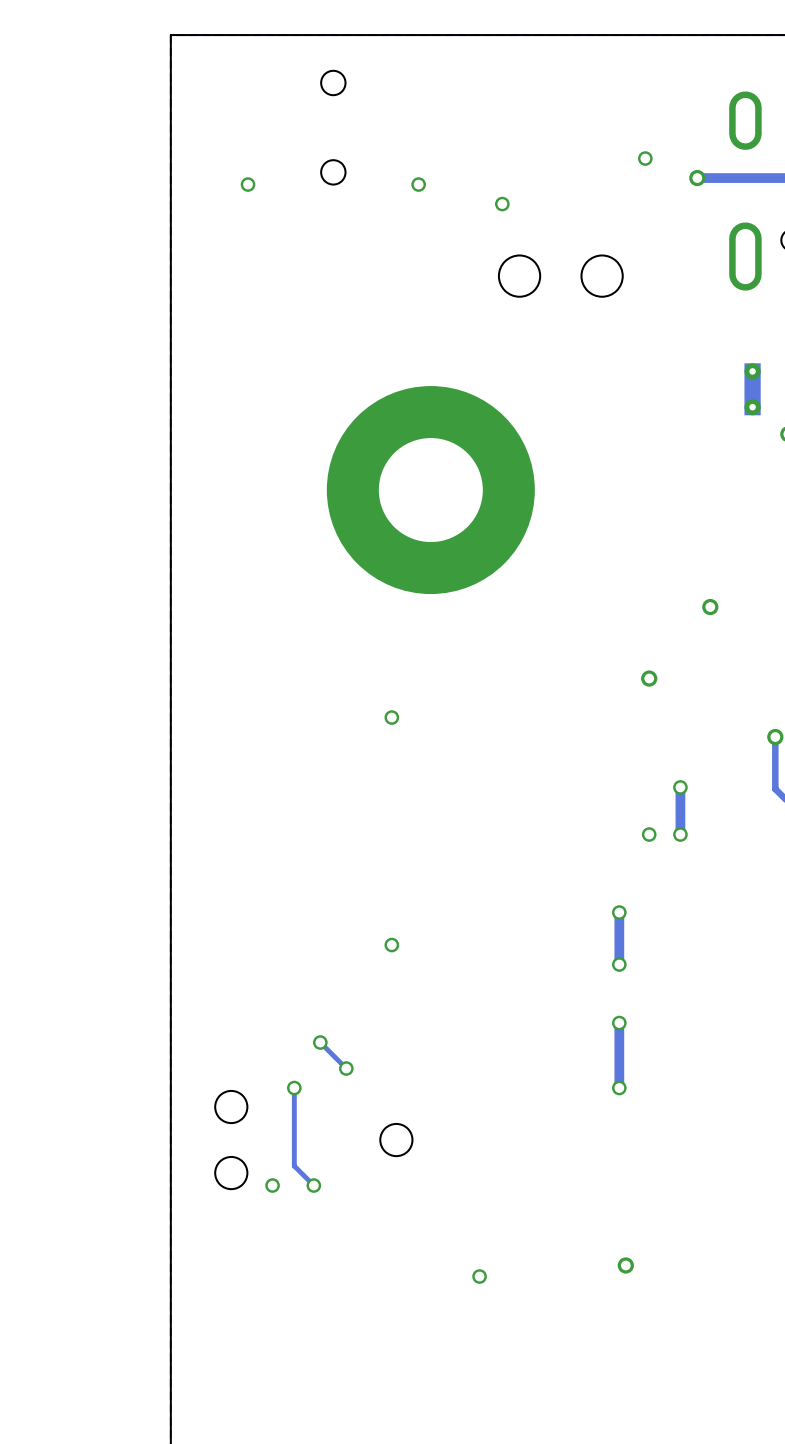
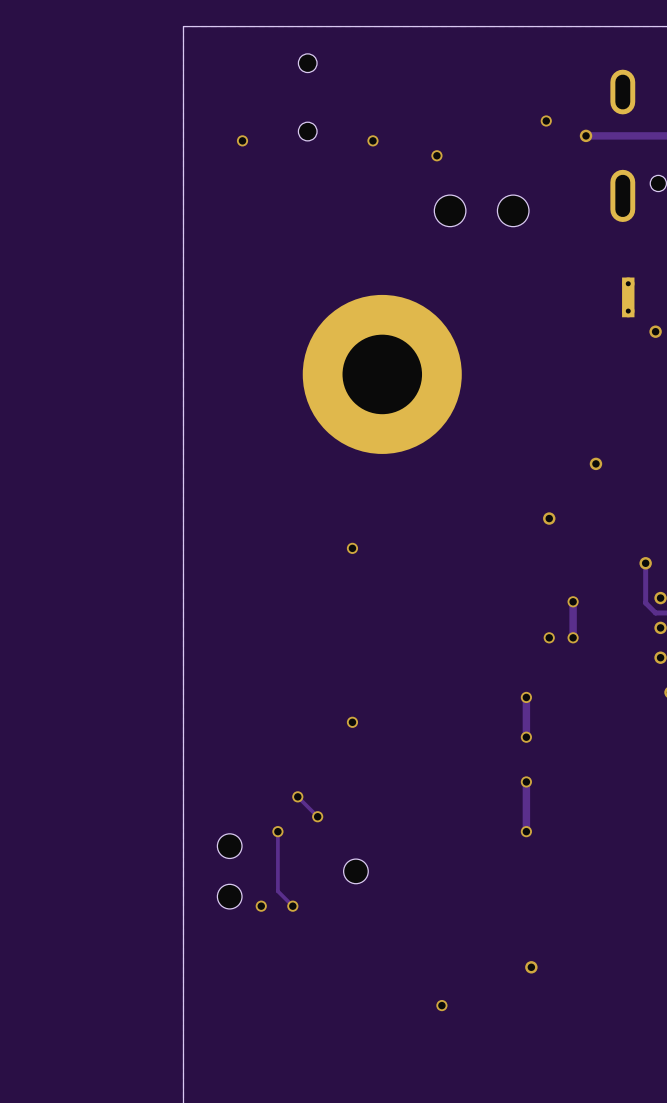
via position: (479, 1276) -> (441, 1005)

